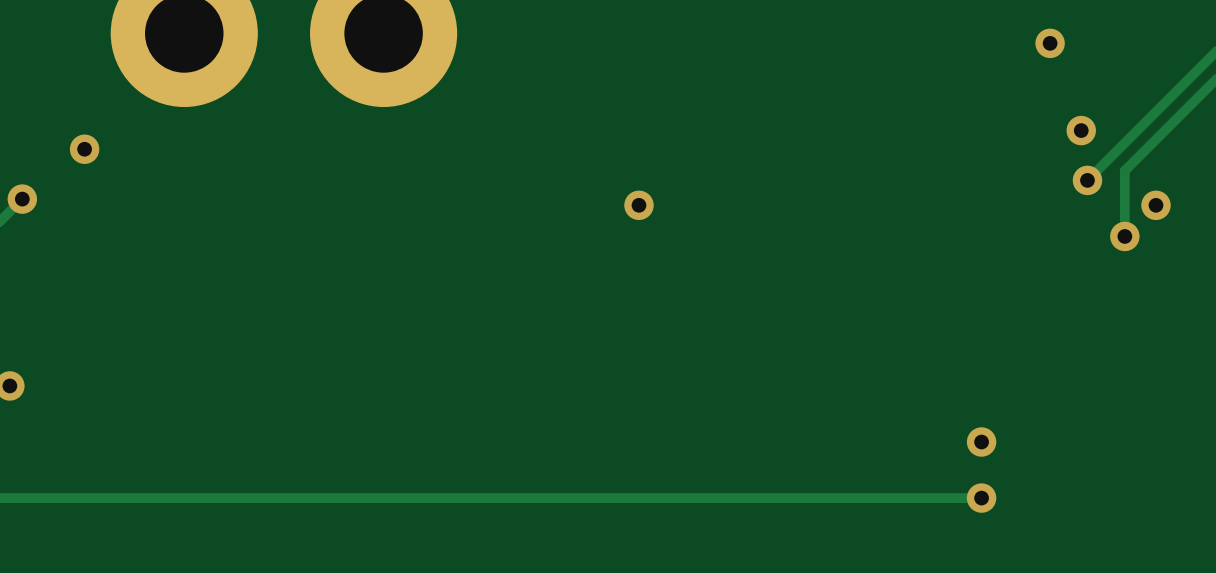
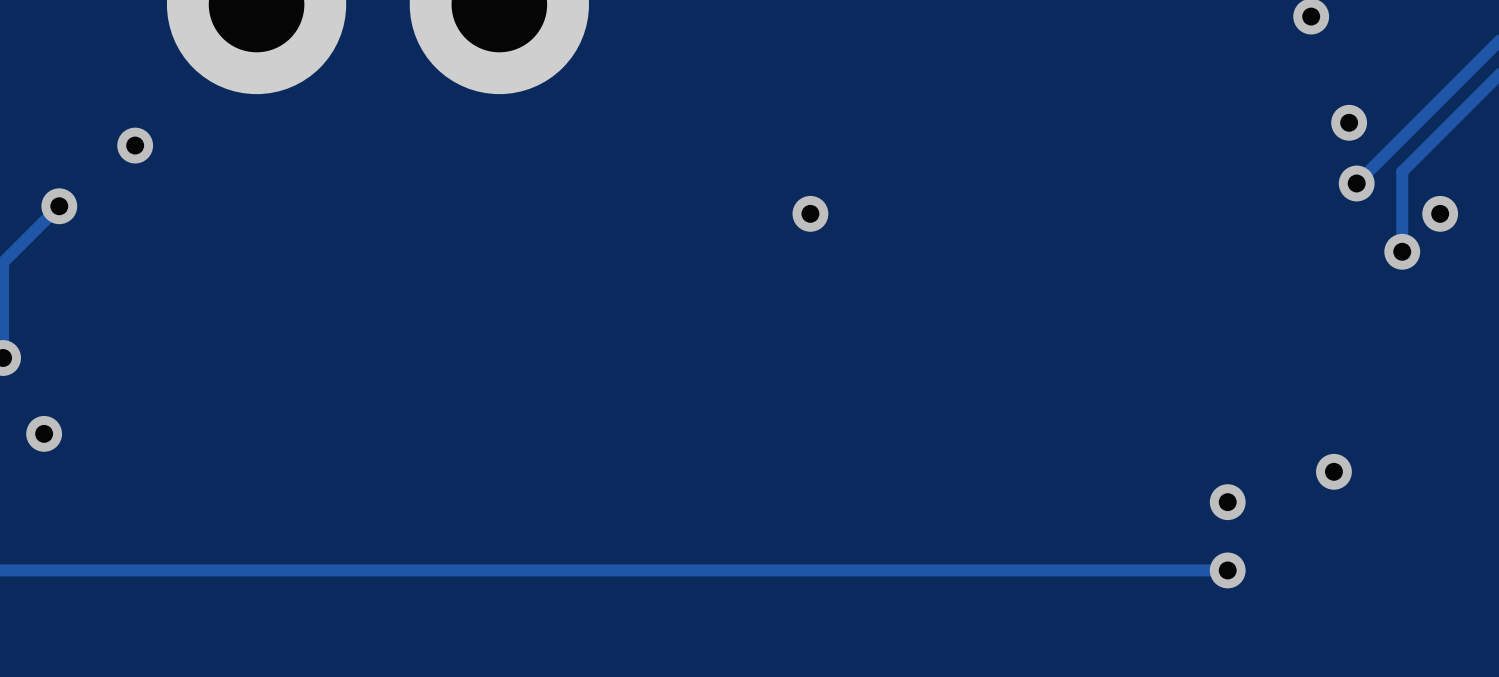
via: none -> (1333, 471)

